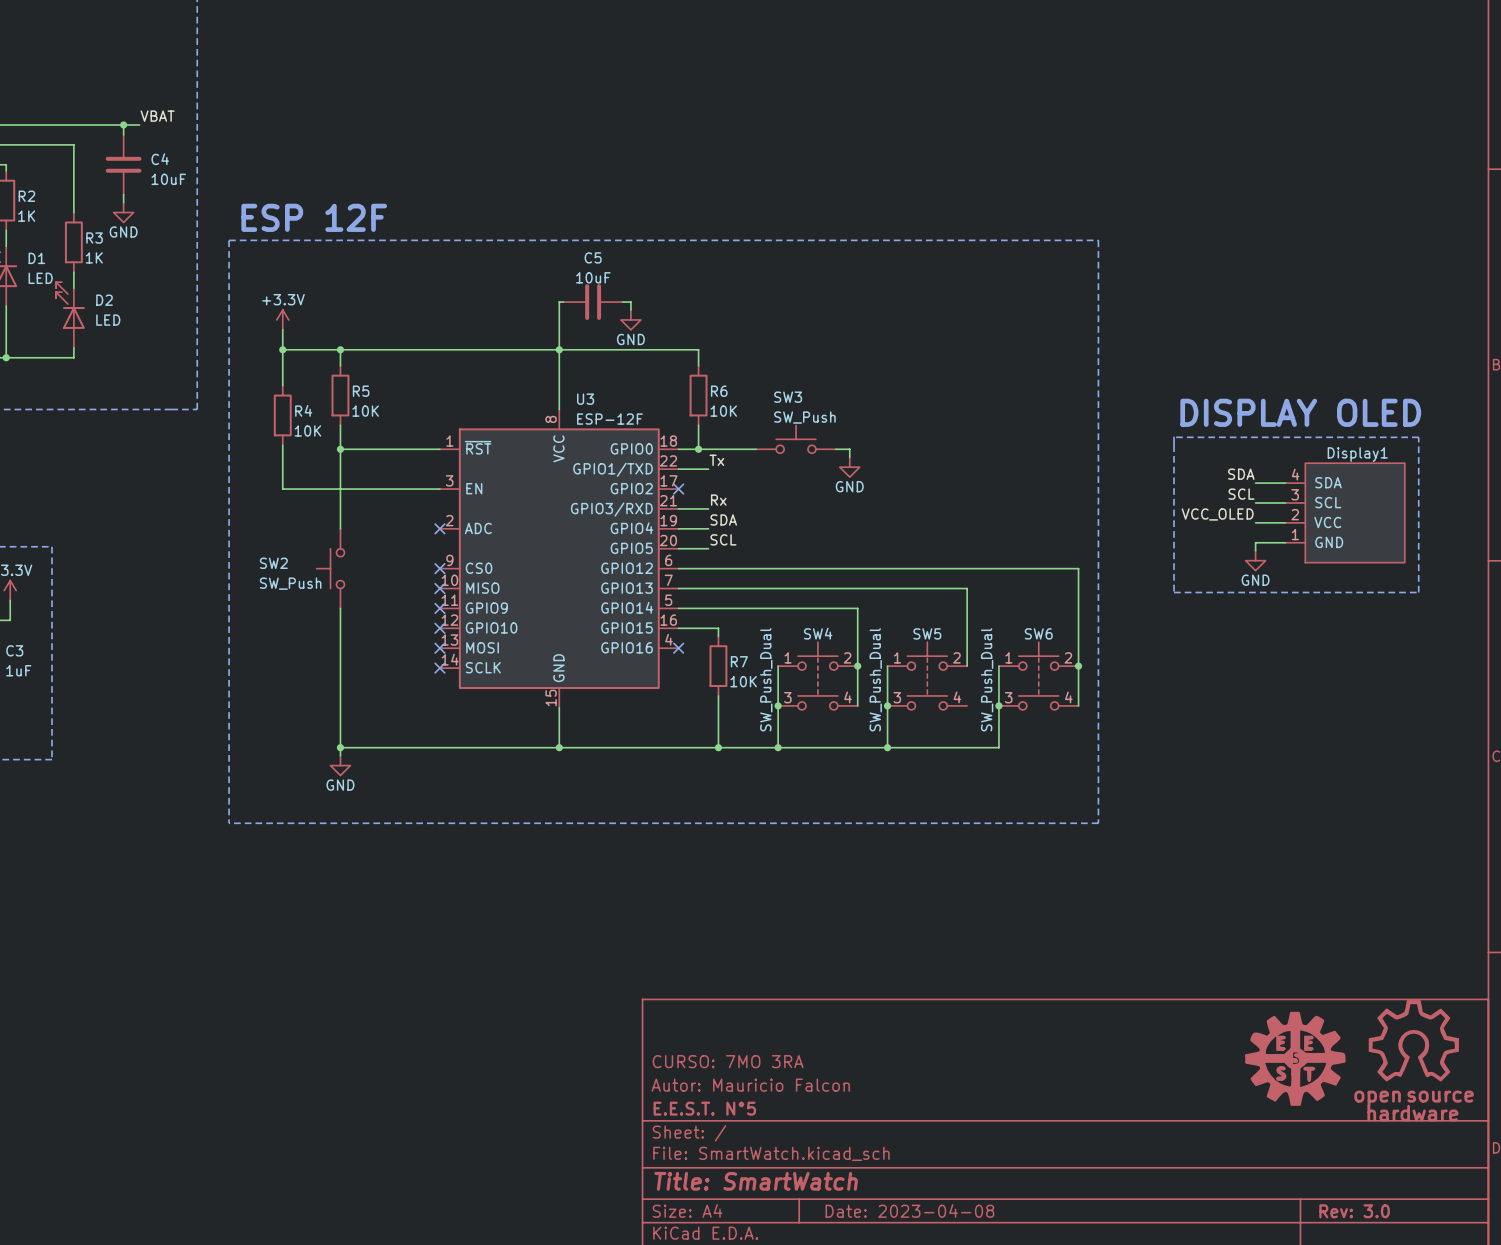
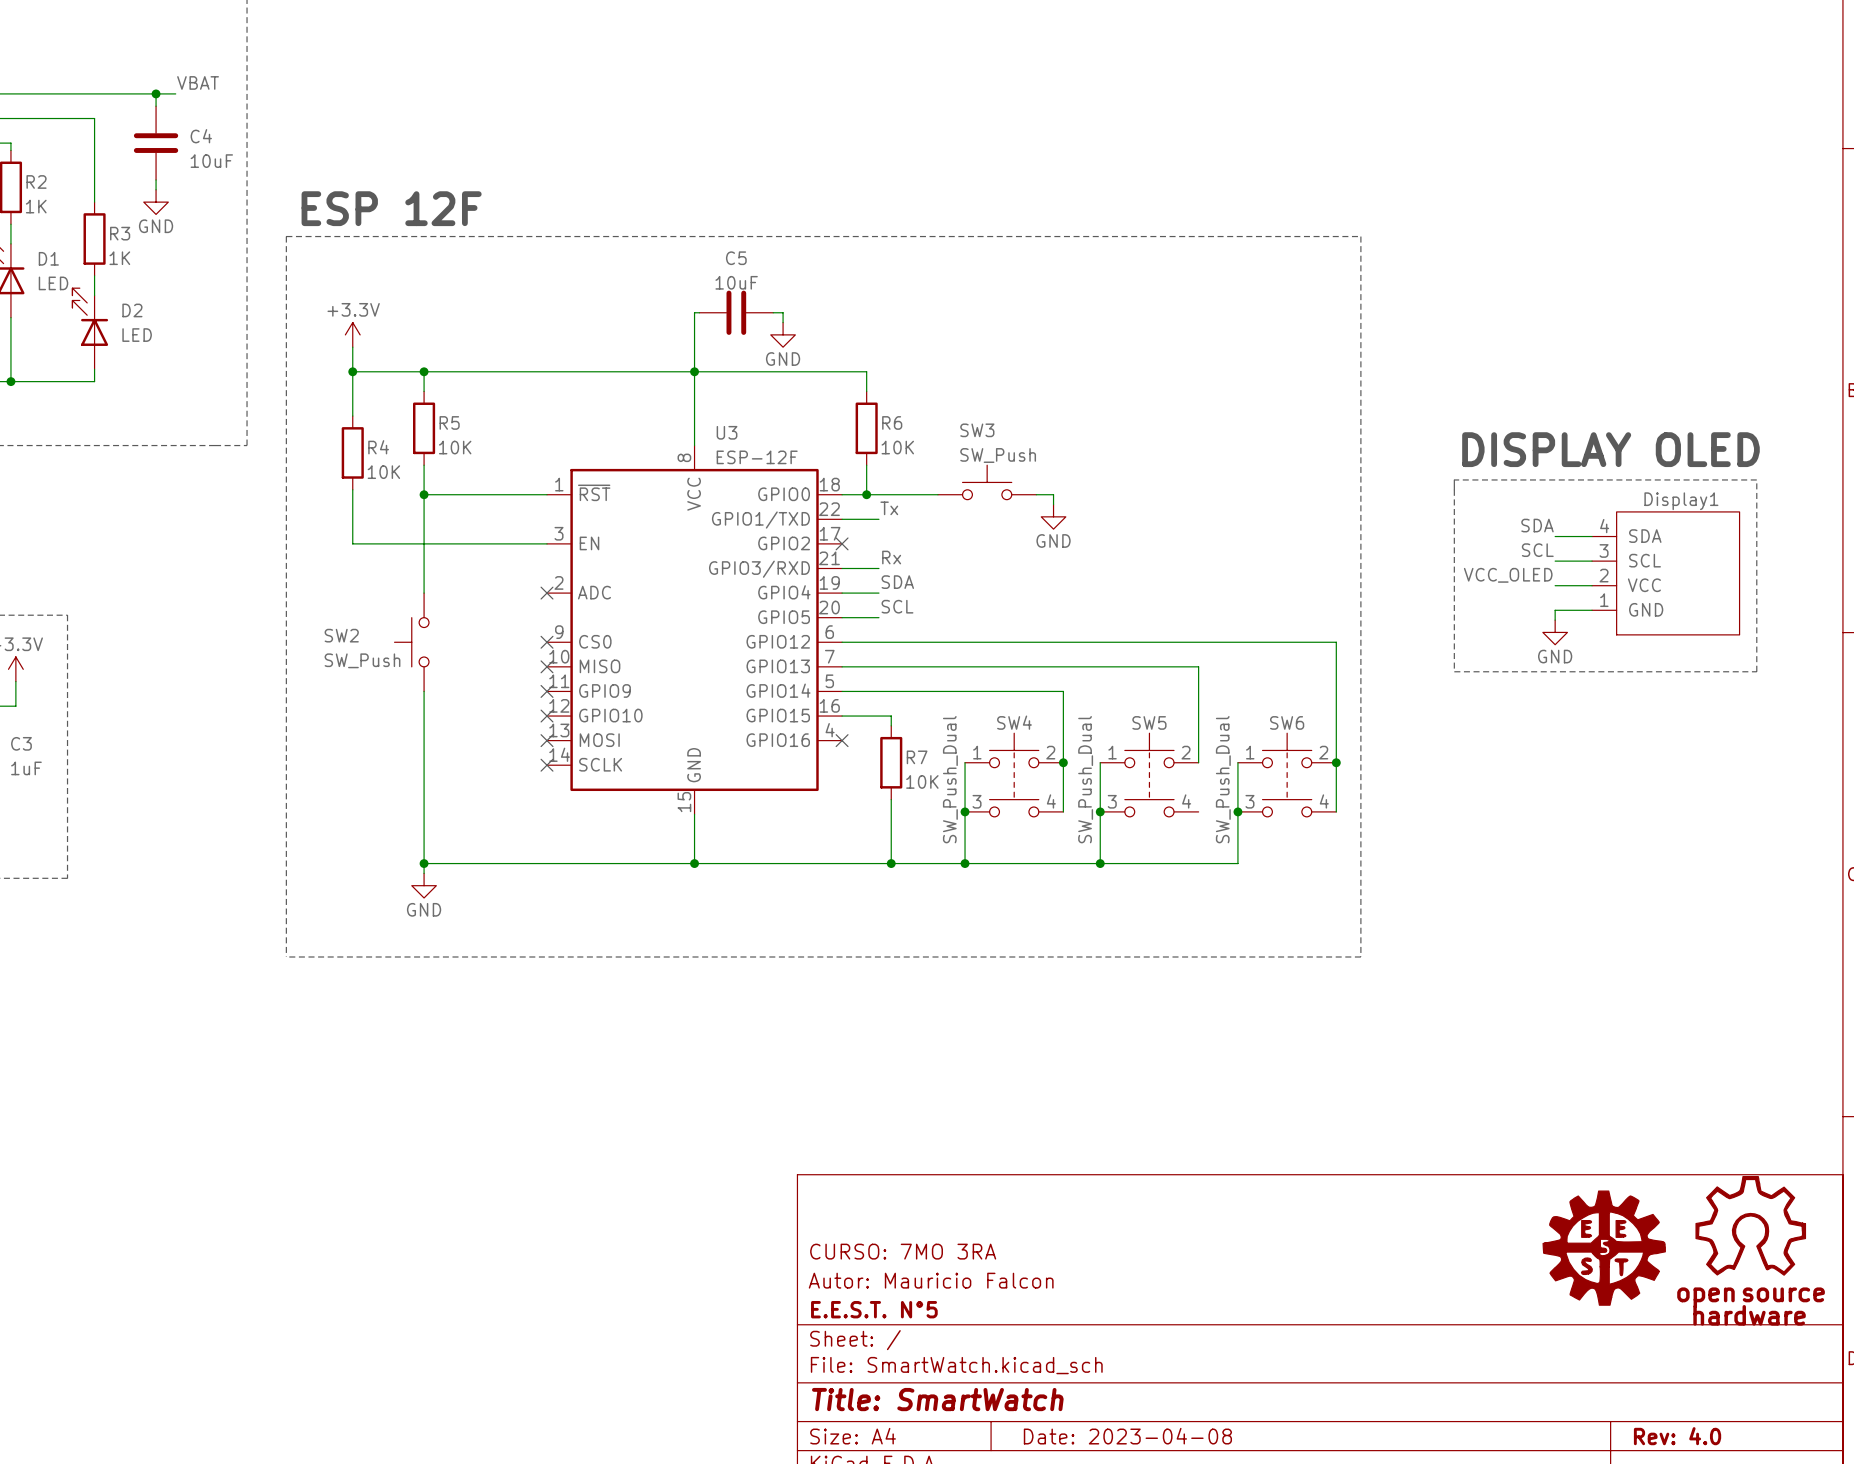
title block: Rev: 3.0 (1354, 1211) -> Rev: 4.0 (1677, 1436)

